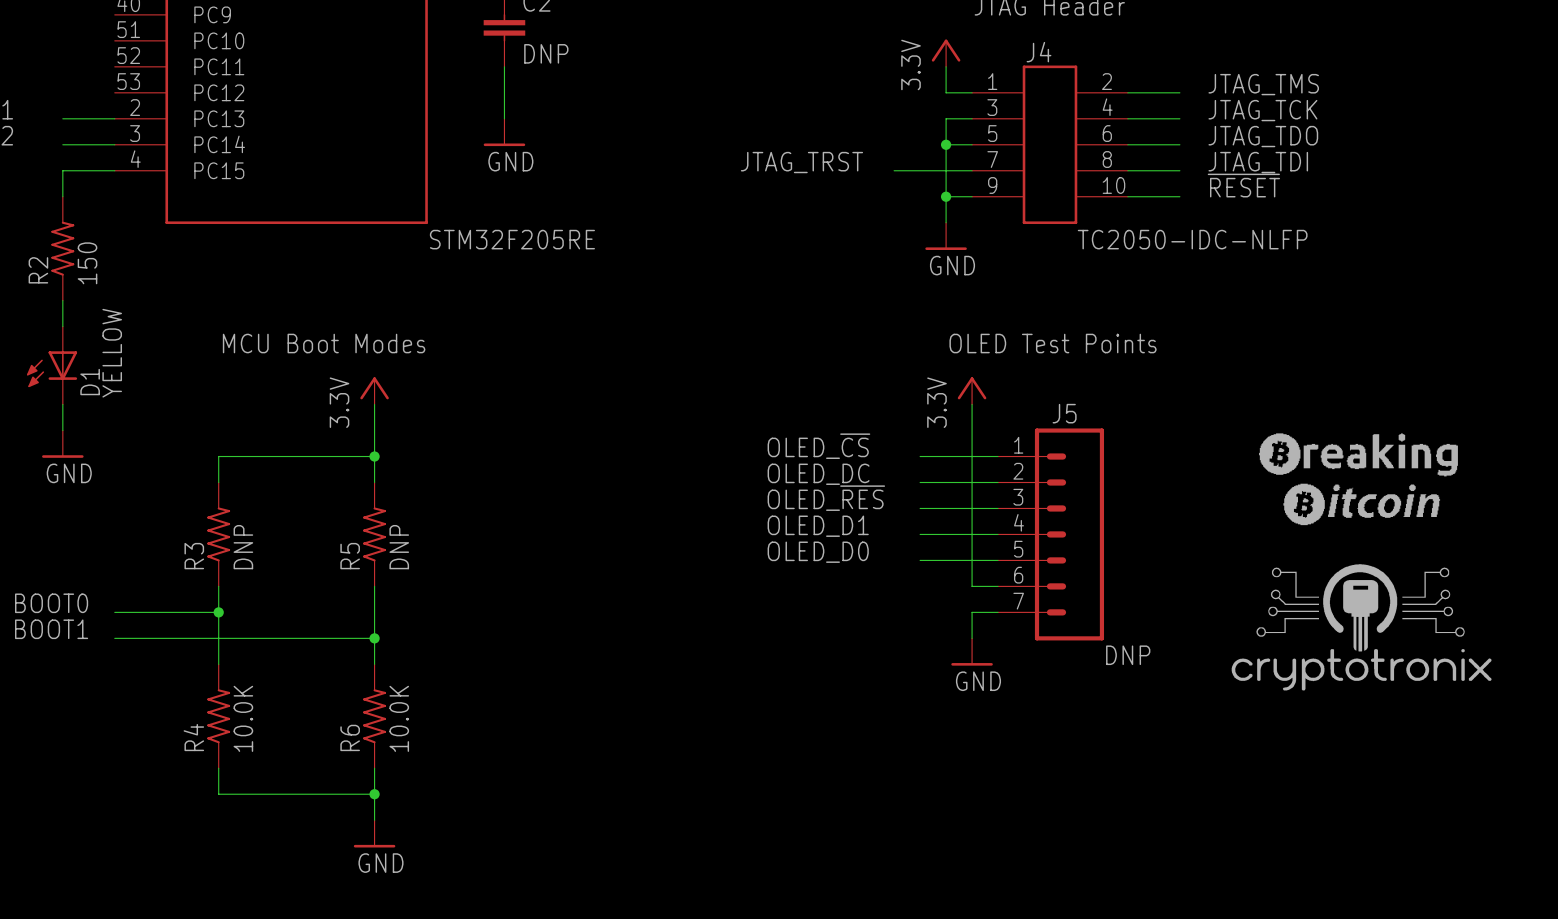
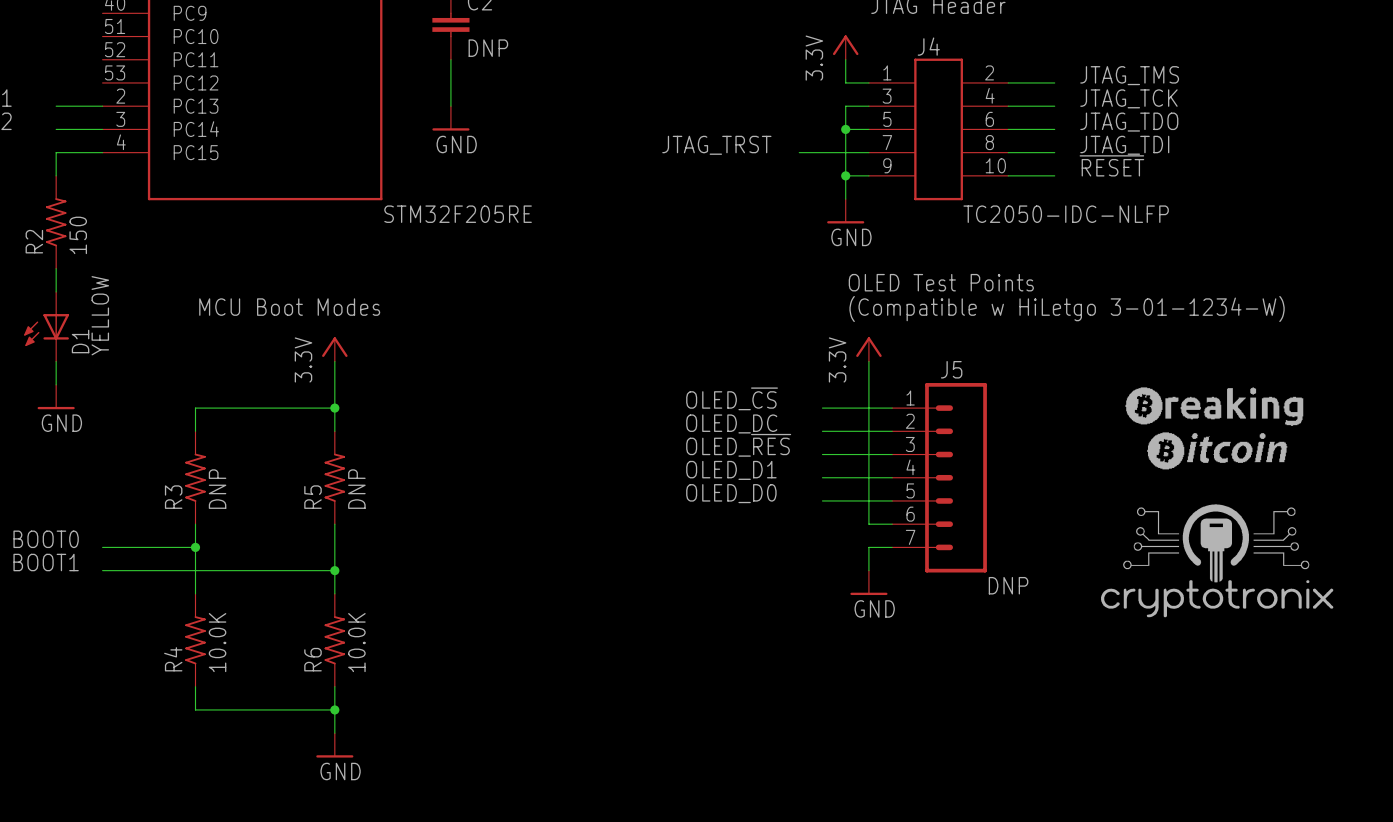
text: none -> OLED Test Points (941, 282)
text: OLED Test Points (1053, 343) -> (Compatible w HiLetgo 3-01-1234-W) (1067, 309)

